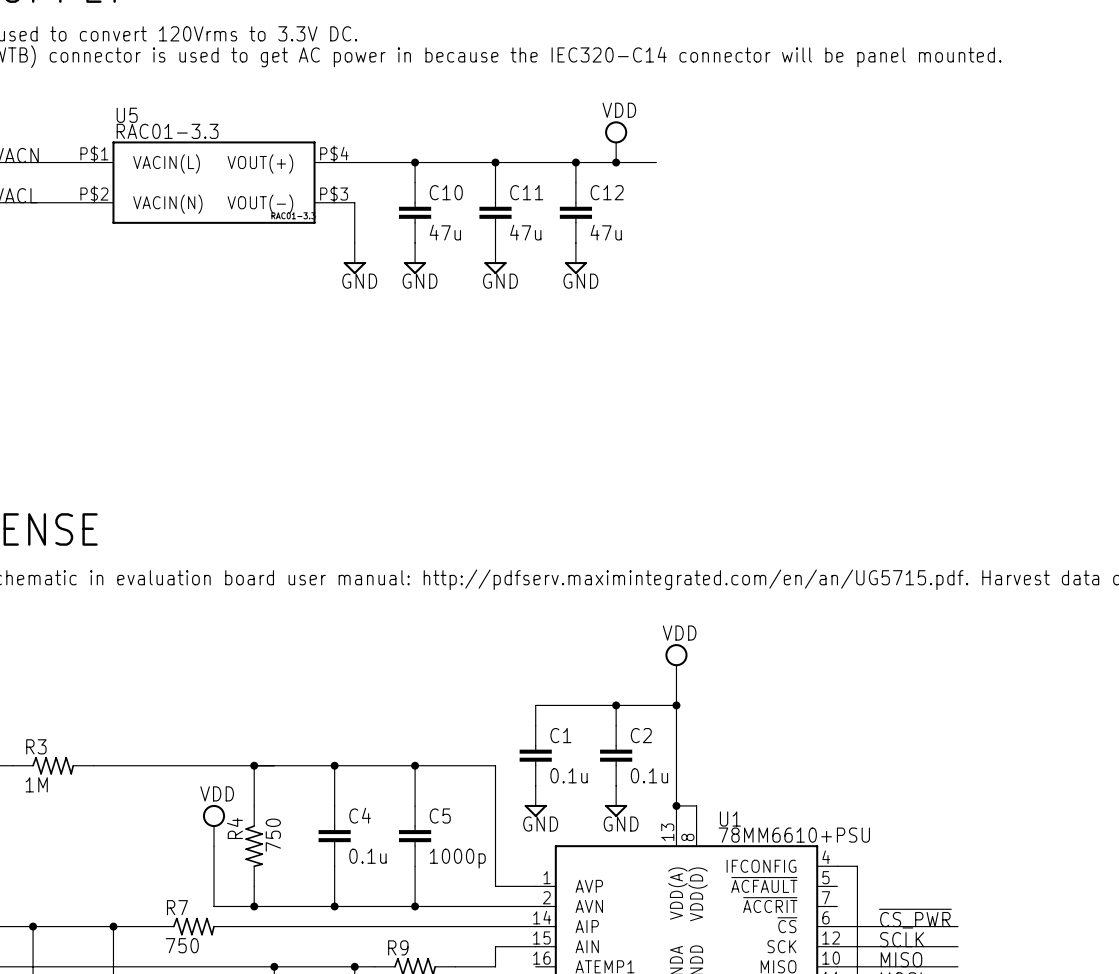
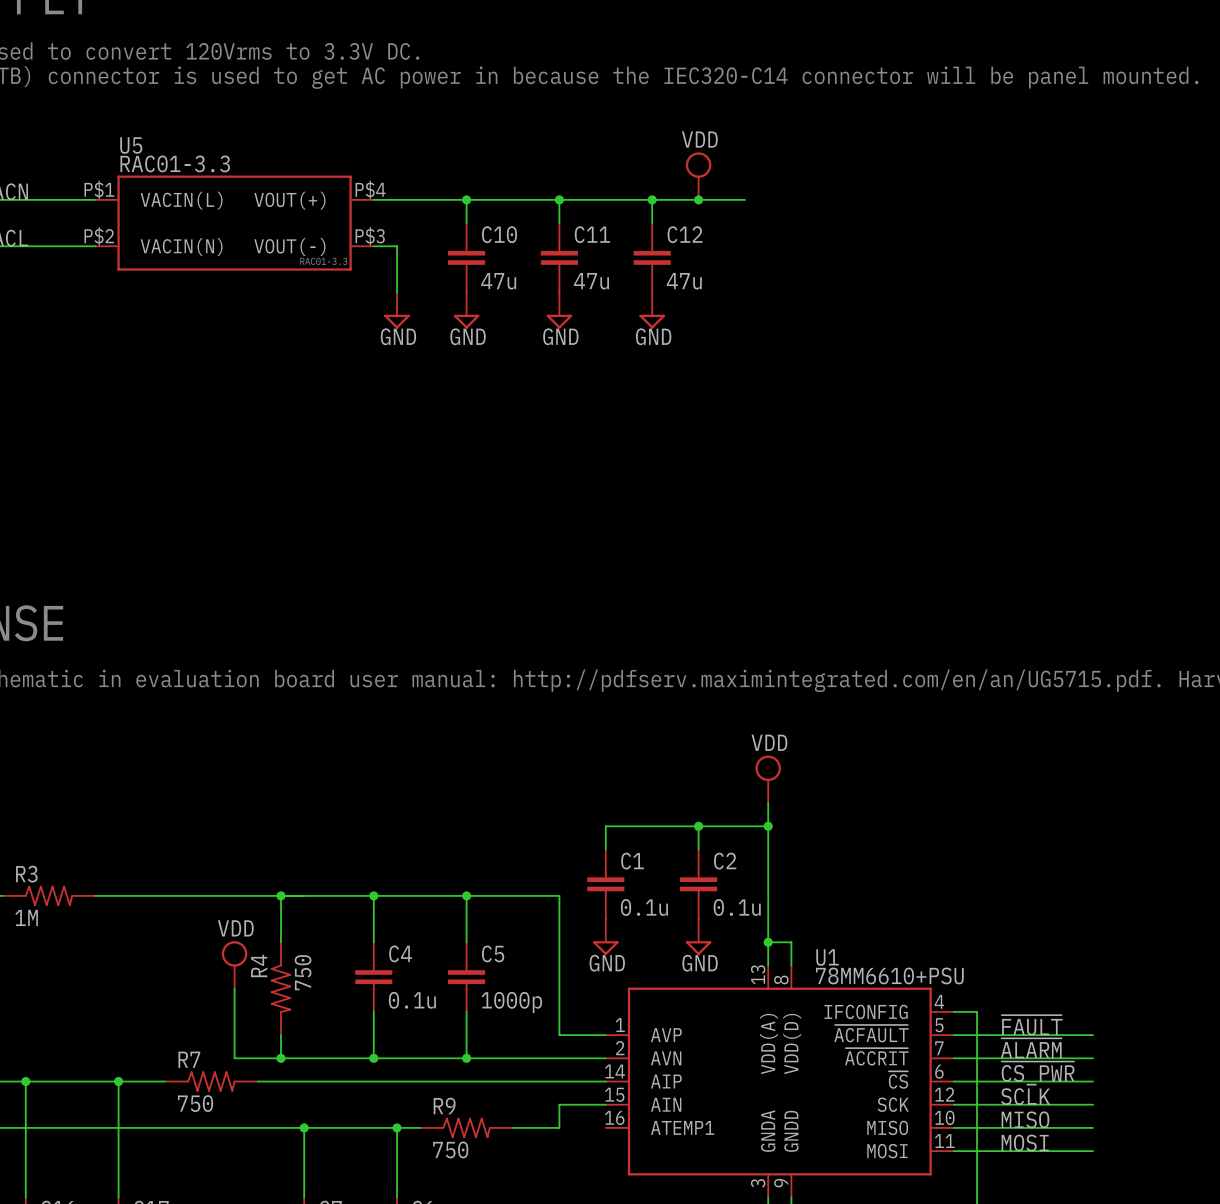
label: none -> ~{FAULT} (1032, 1025)
wire: none -> (953, 1035) (1093, 1035)
label: none -> ~{ALARM} (1031, 1048)
wire: none -> (953, 1058) (1093, 1058)

